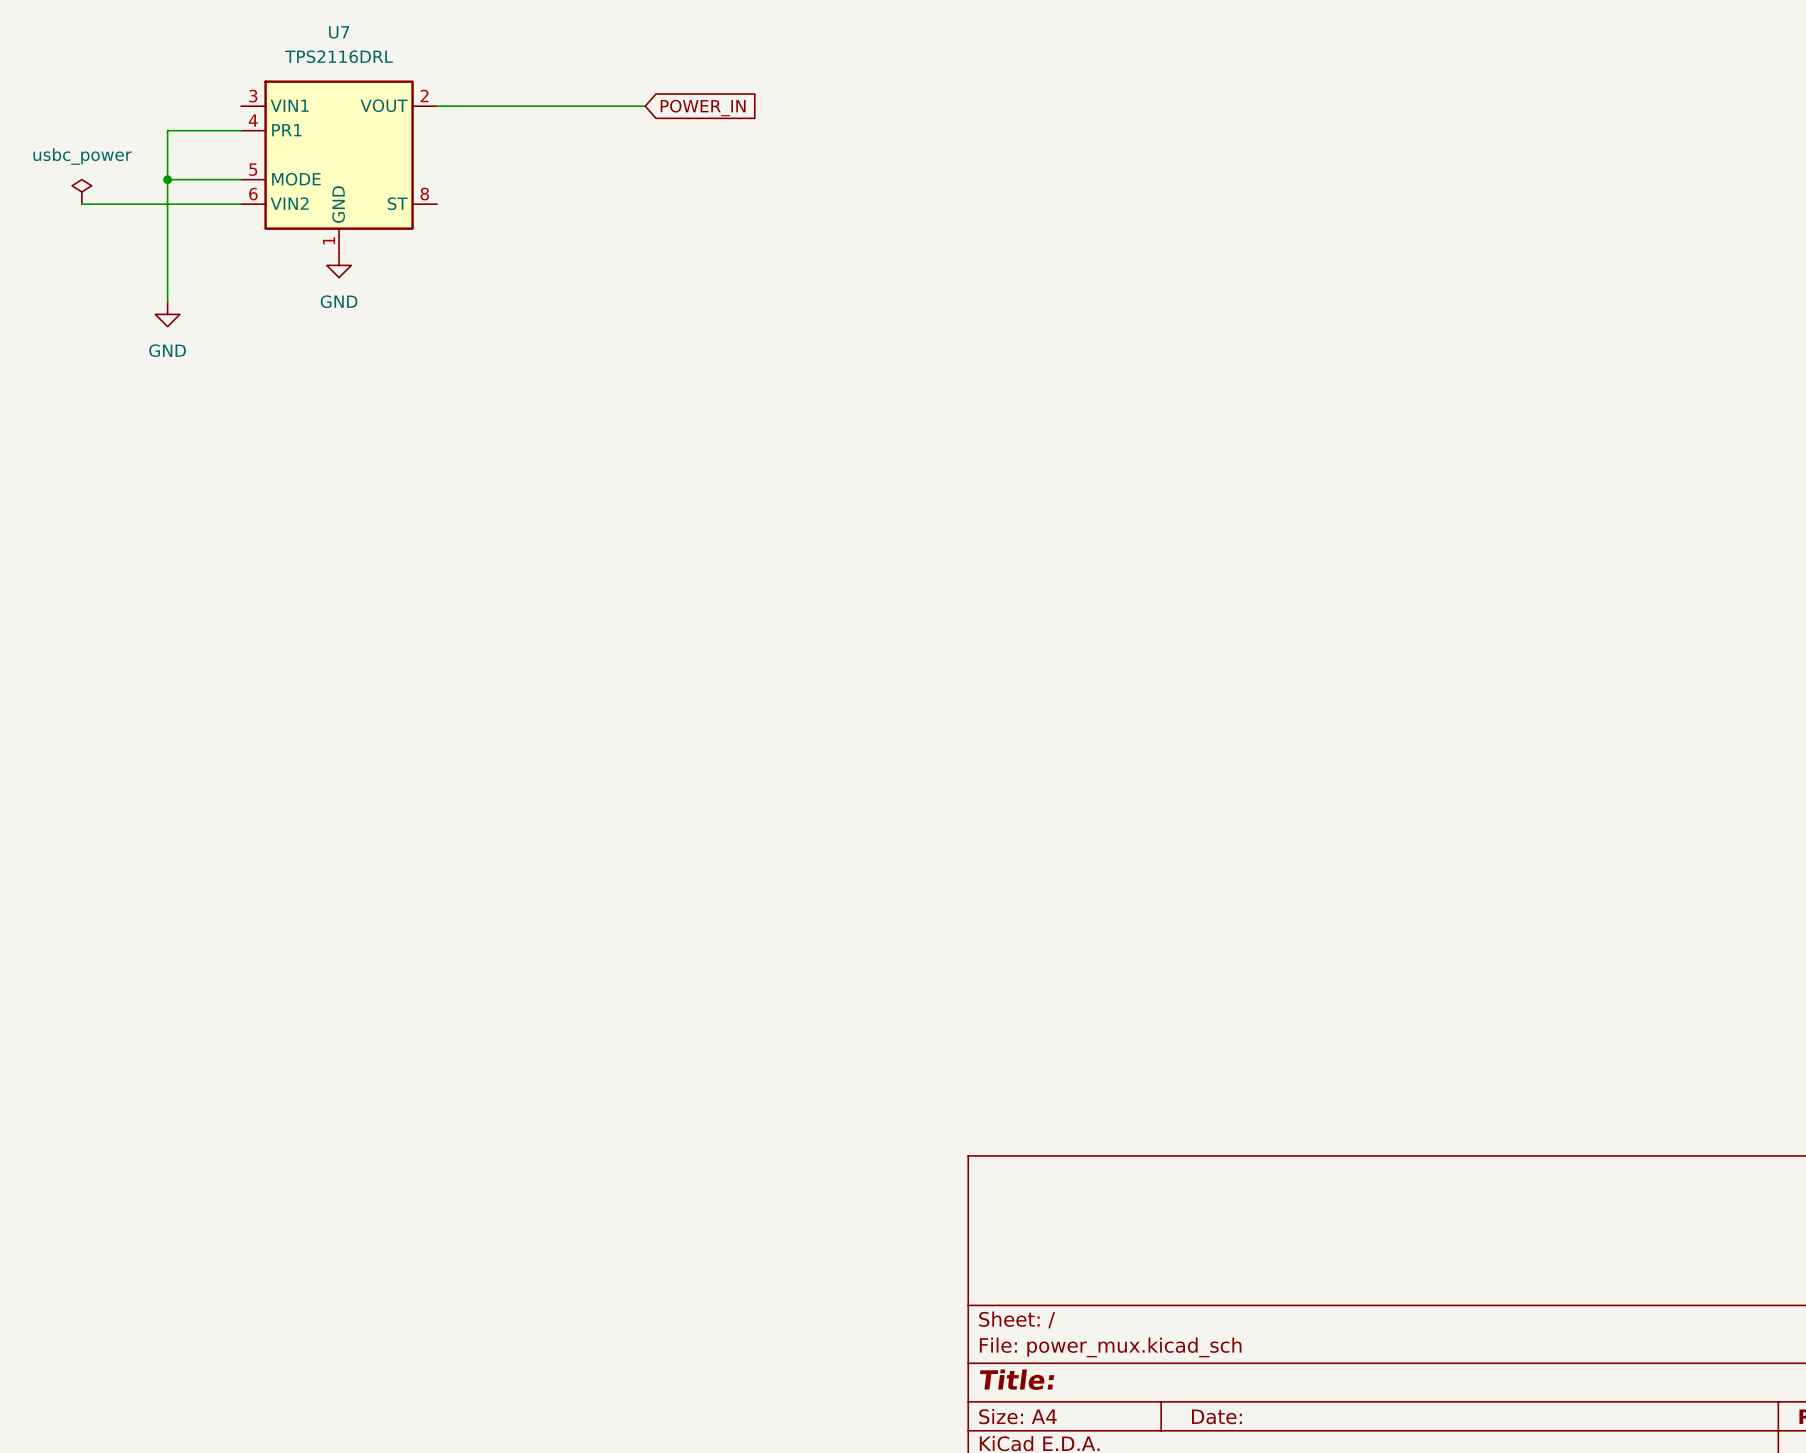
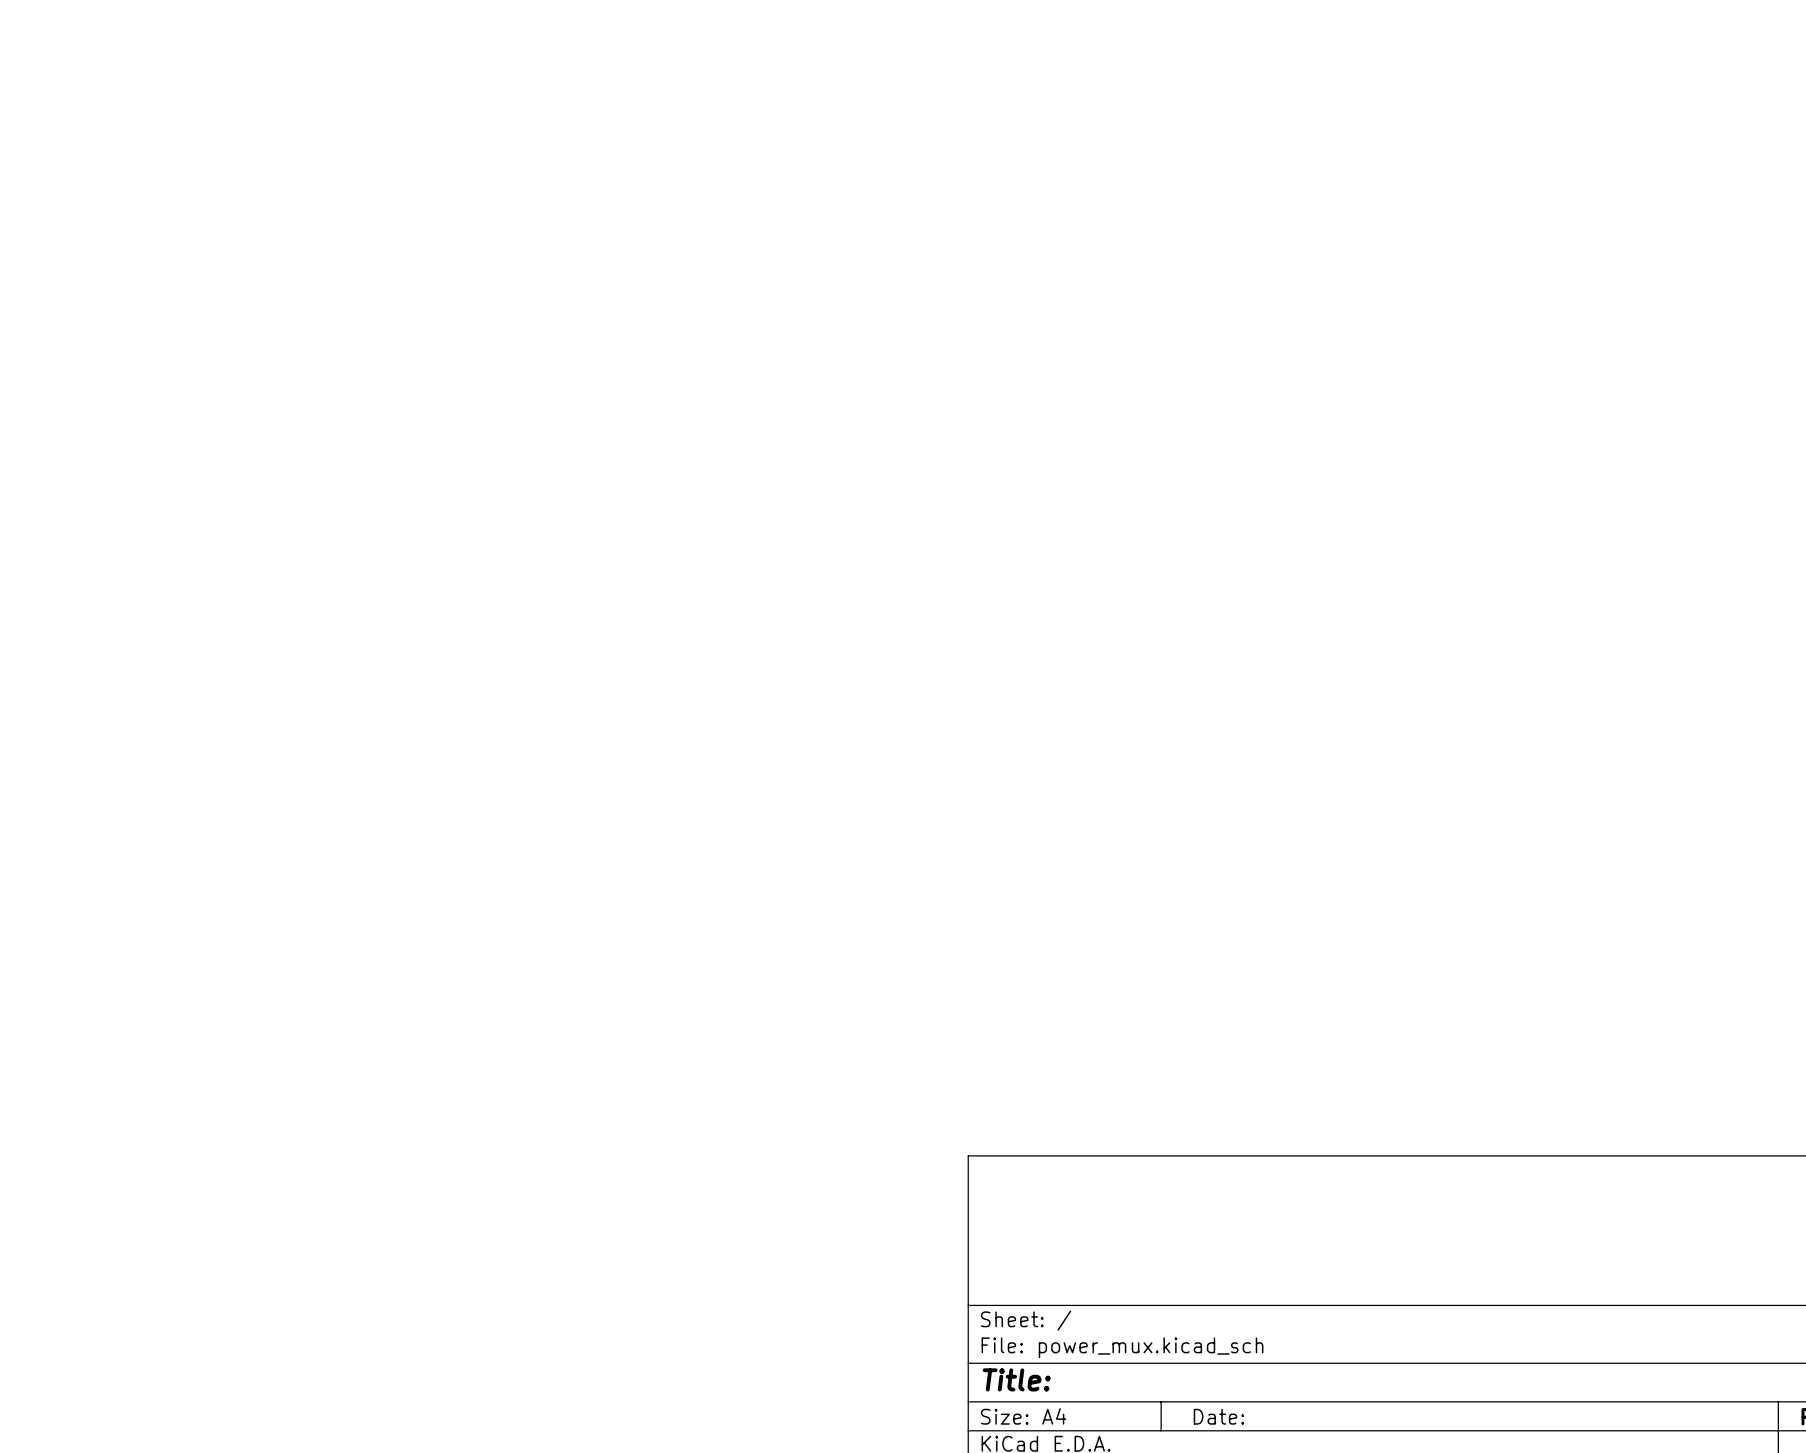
wire: (437, 106) (645, 106) -> none
global label: POWER_IN (703, 108) -> none
wire: (241, 130) (167, 130) (167, 302) -> none
U7: TPS2116DRL (339, 166) -> none
wire: (167, 179) (241, 179) -> none
junction: (167, 179) -> none
power symbol: usbc_power (81, 191) -> none
wire: (81, 204) (241, 204) -> none
power symbol: GND (339, 265) -> none
power symbol: GND (167, 314) -> none

